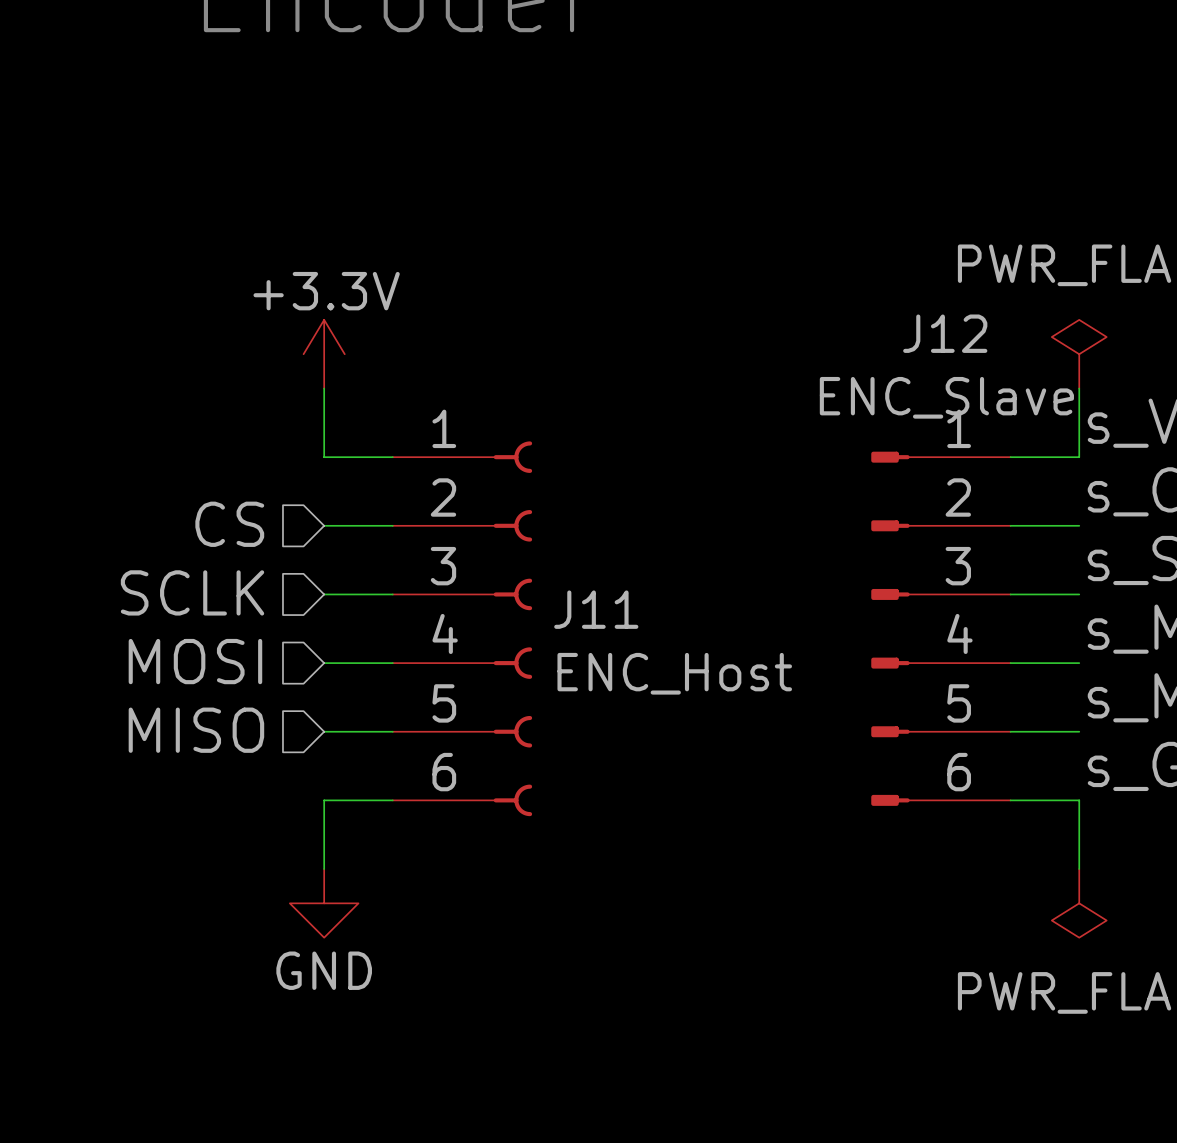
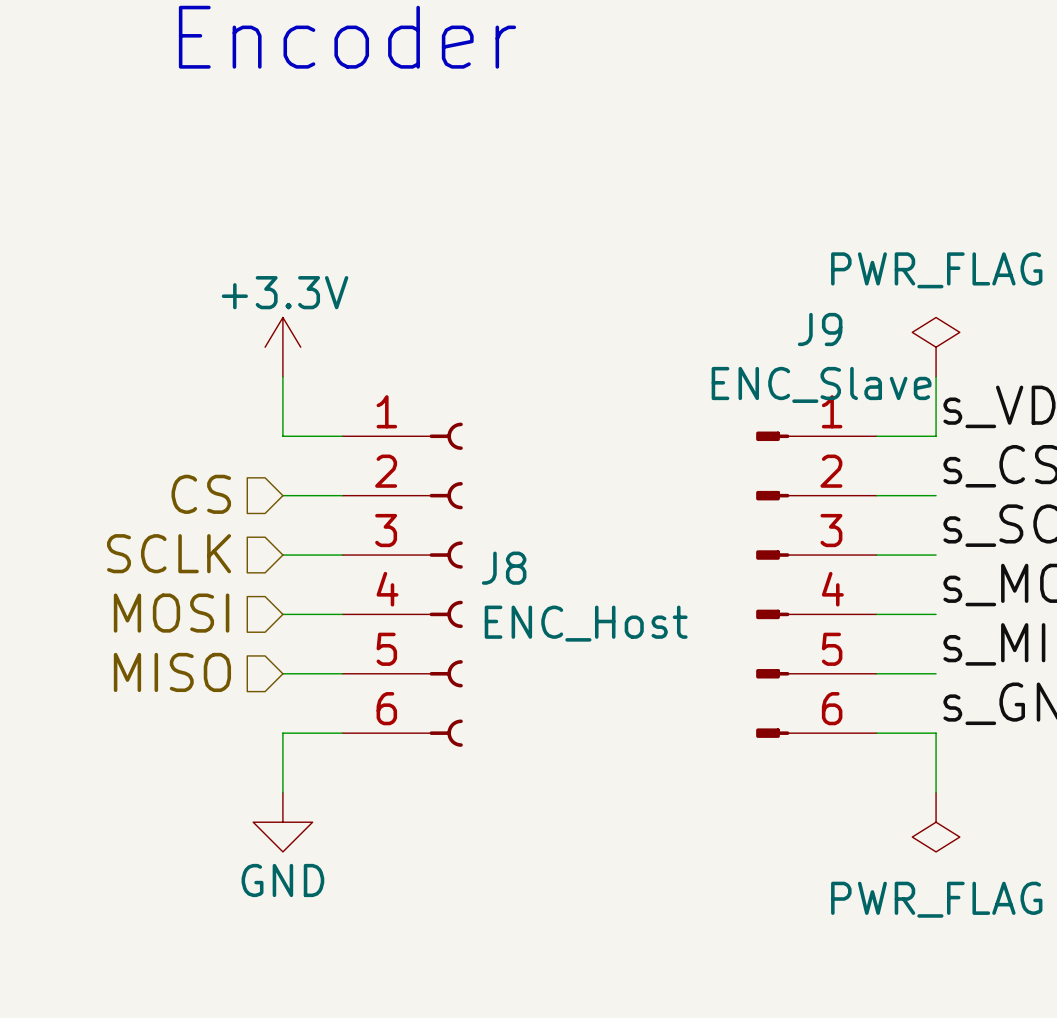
J12 name: J12 (945, 333) -> J9 (820, 329)
J11 name: J11 (596, 609) -> J8 (504, 568)

